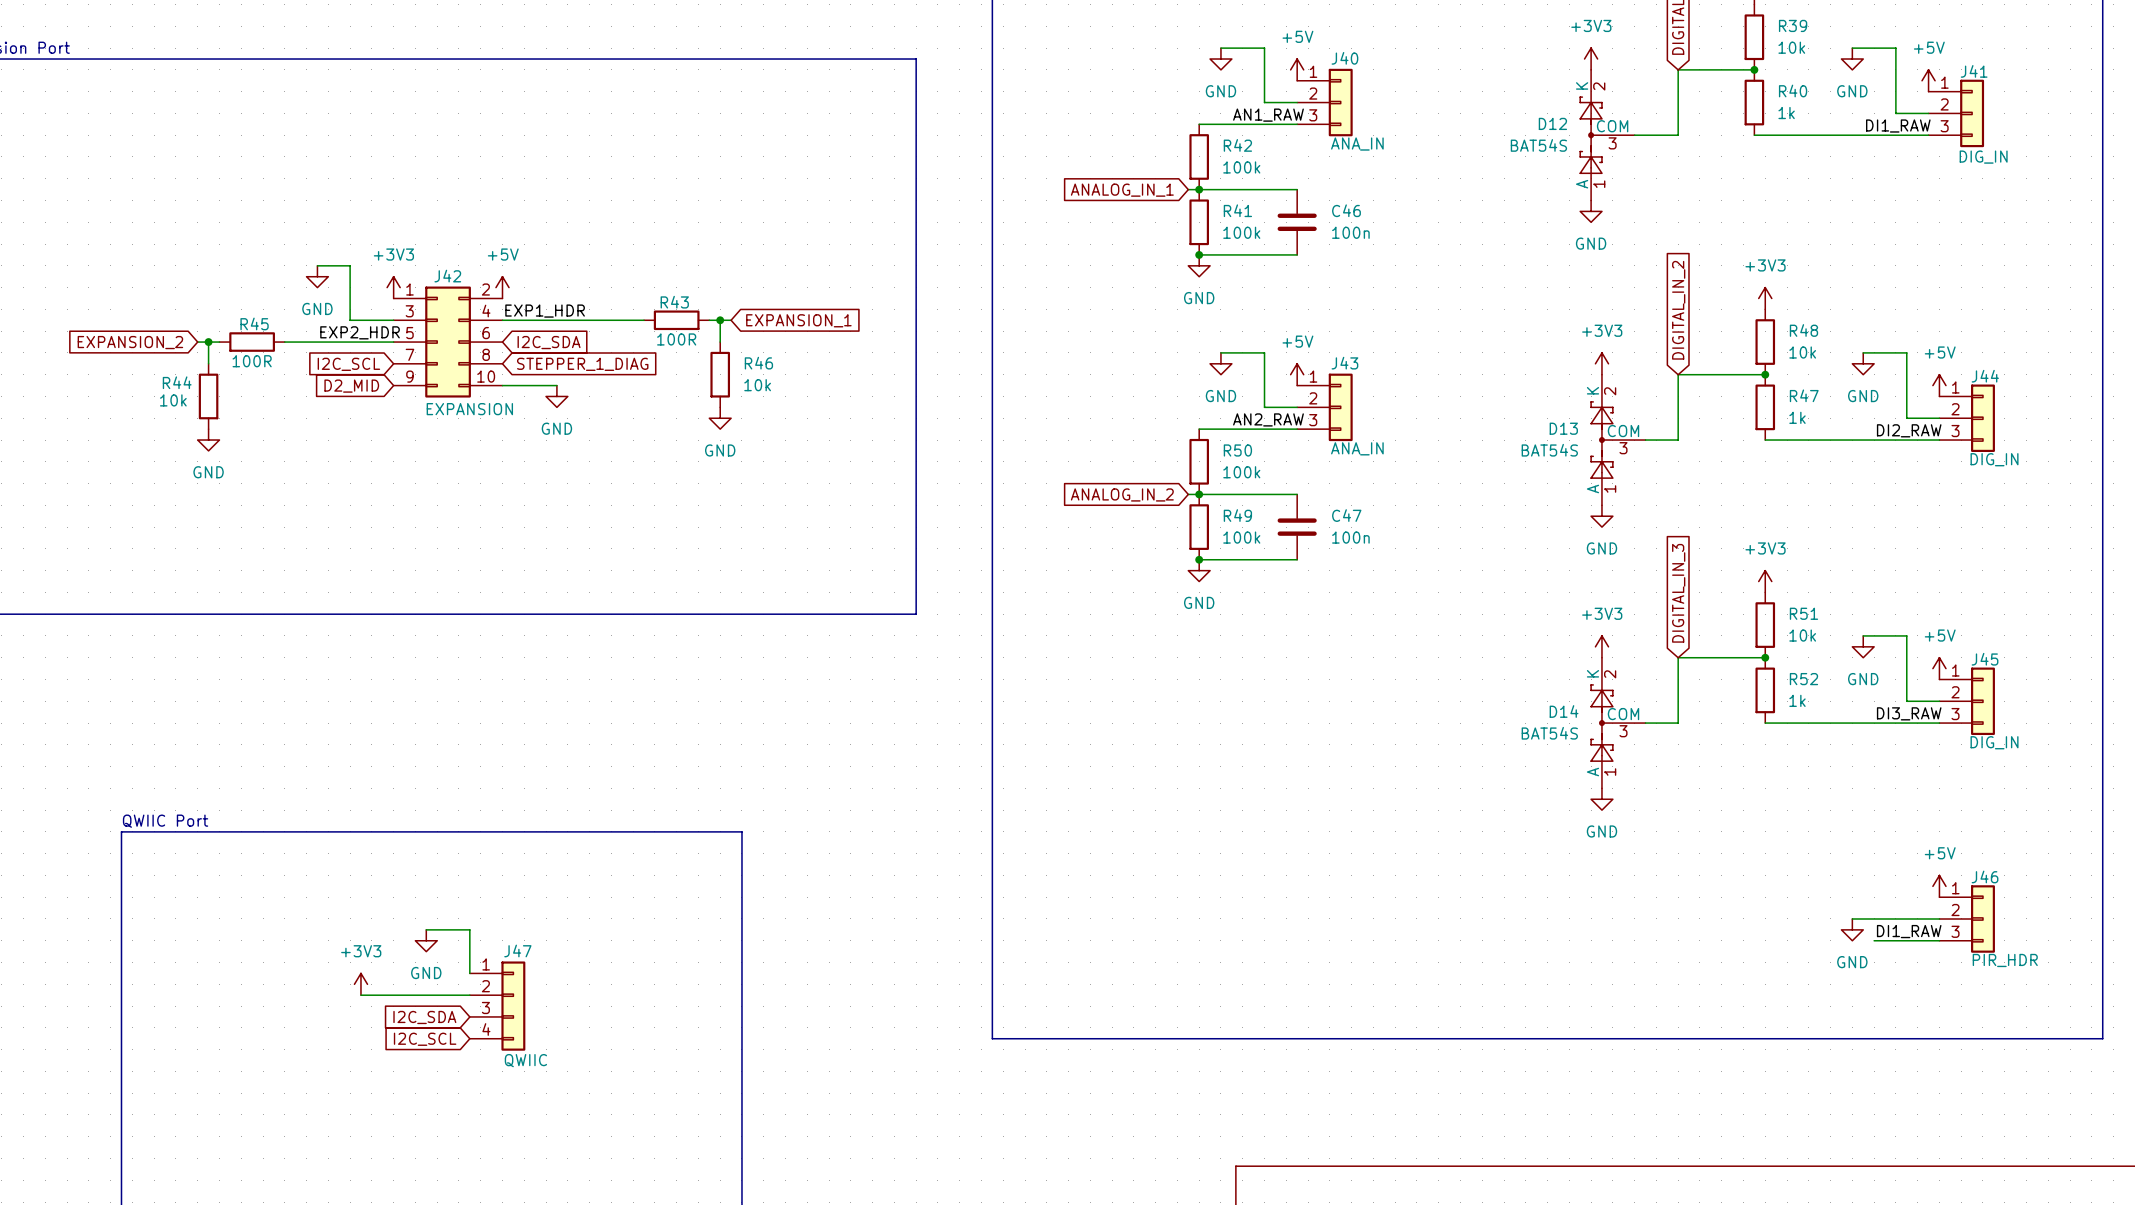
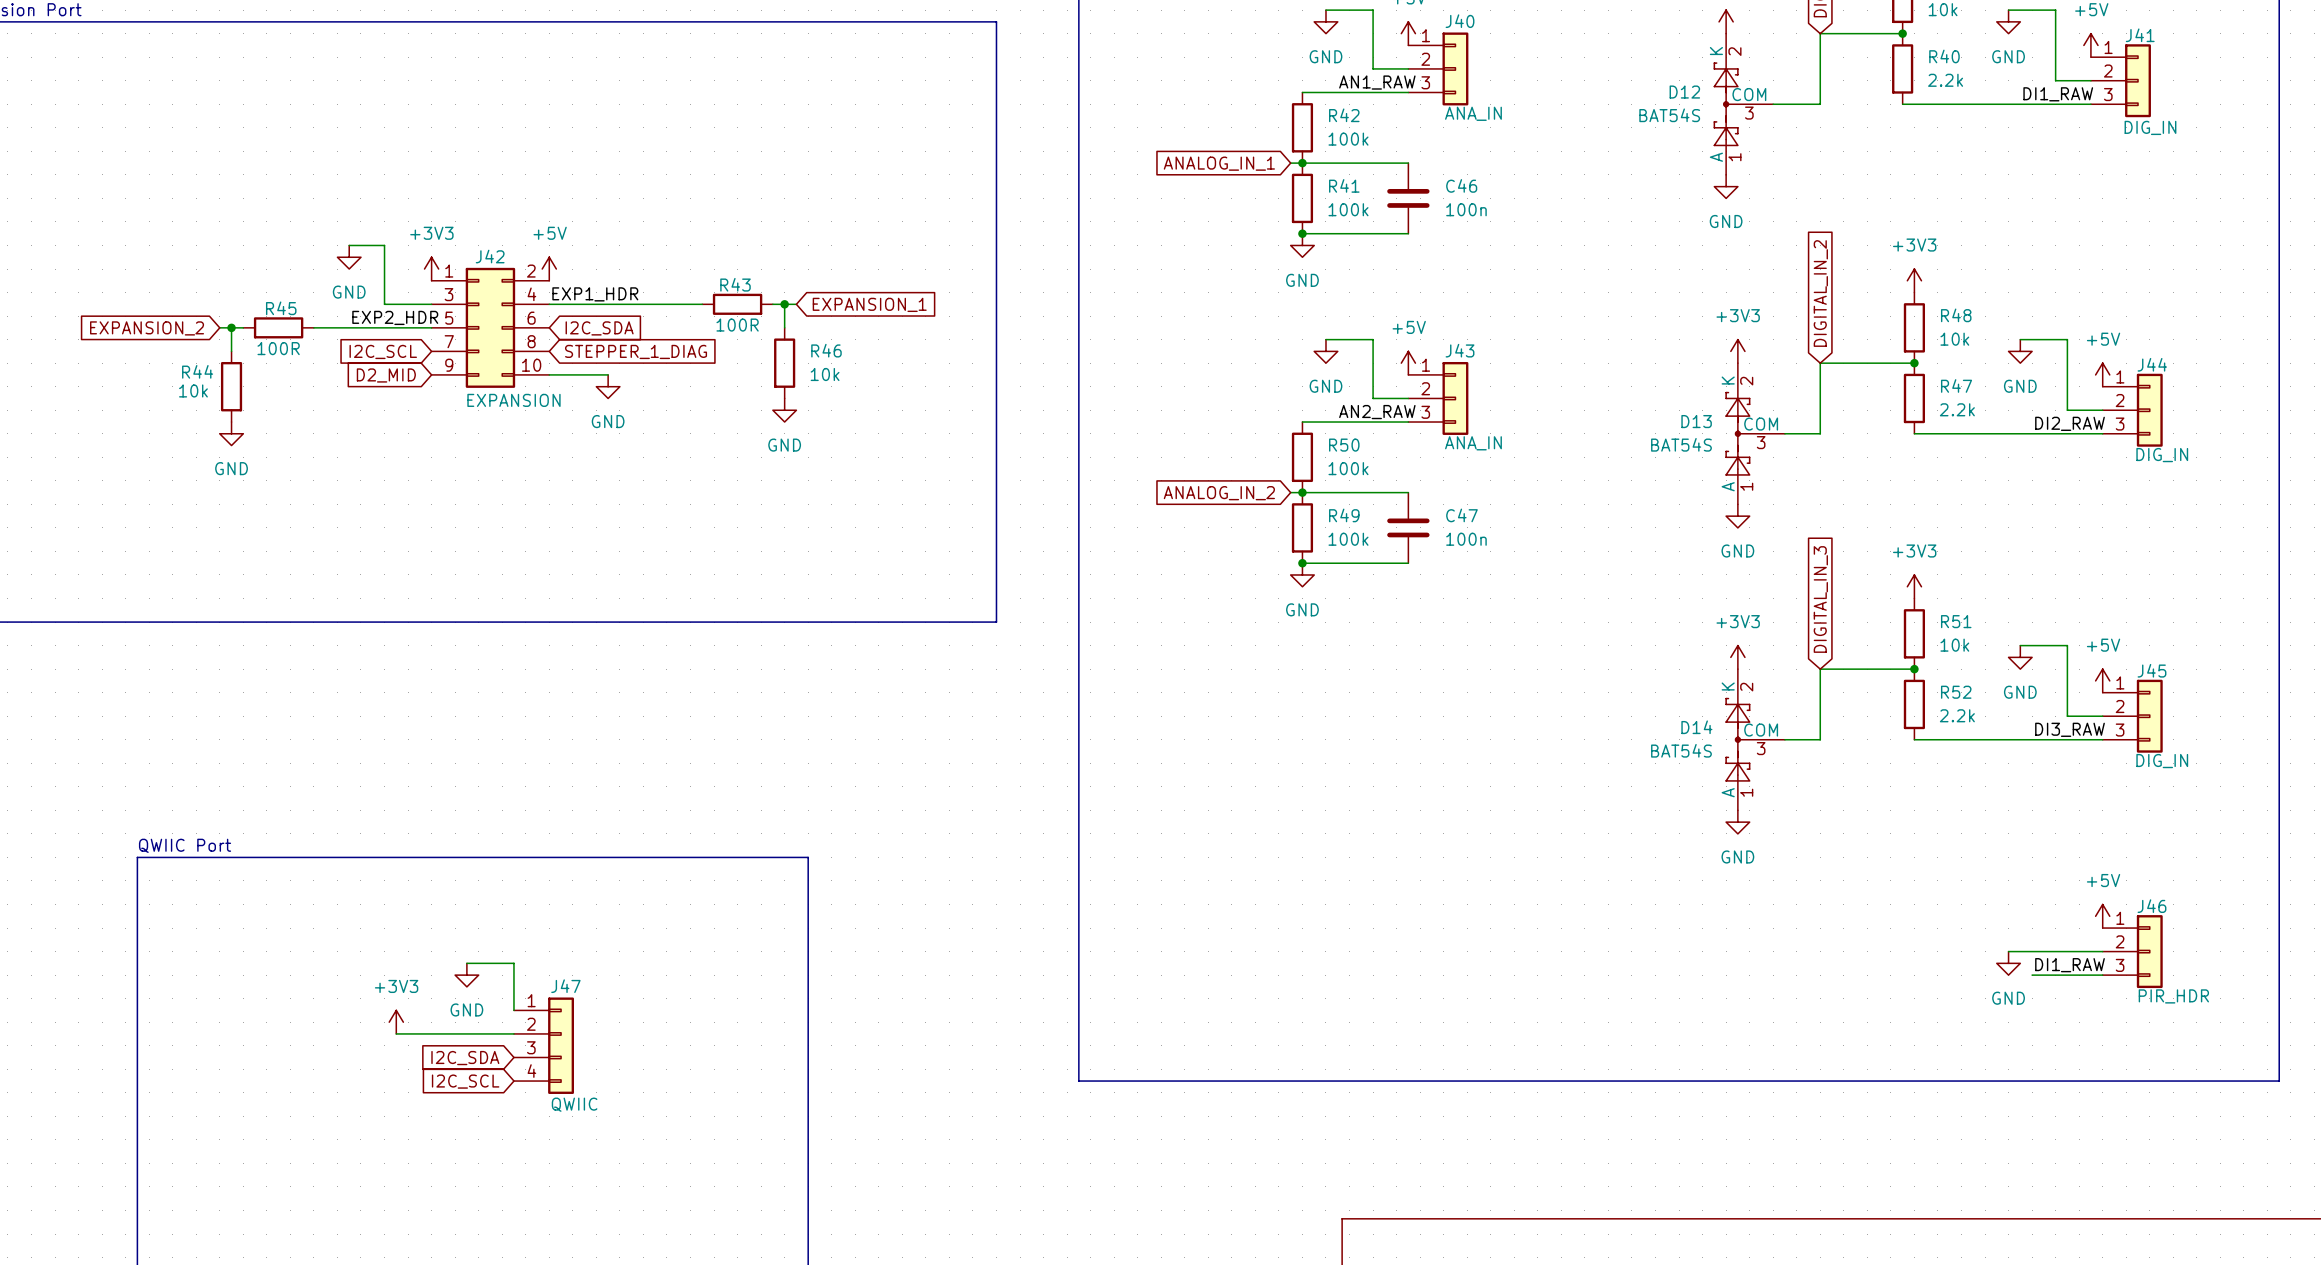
R40 value: 1k (1786, 113) -> 2.2k (1945, 80)
R47 value: 1k (1797, 417) -> 2.2k (1957, 409)
R52 value: 1k (1797, 700) -> 2.2k (1957, 715)

